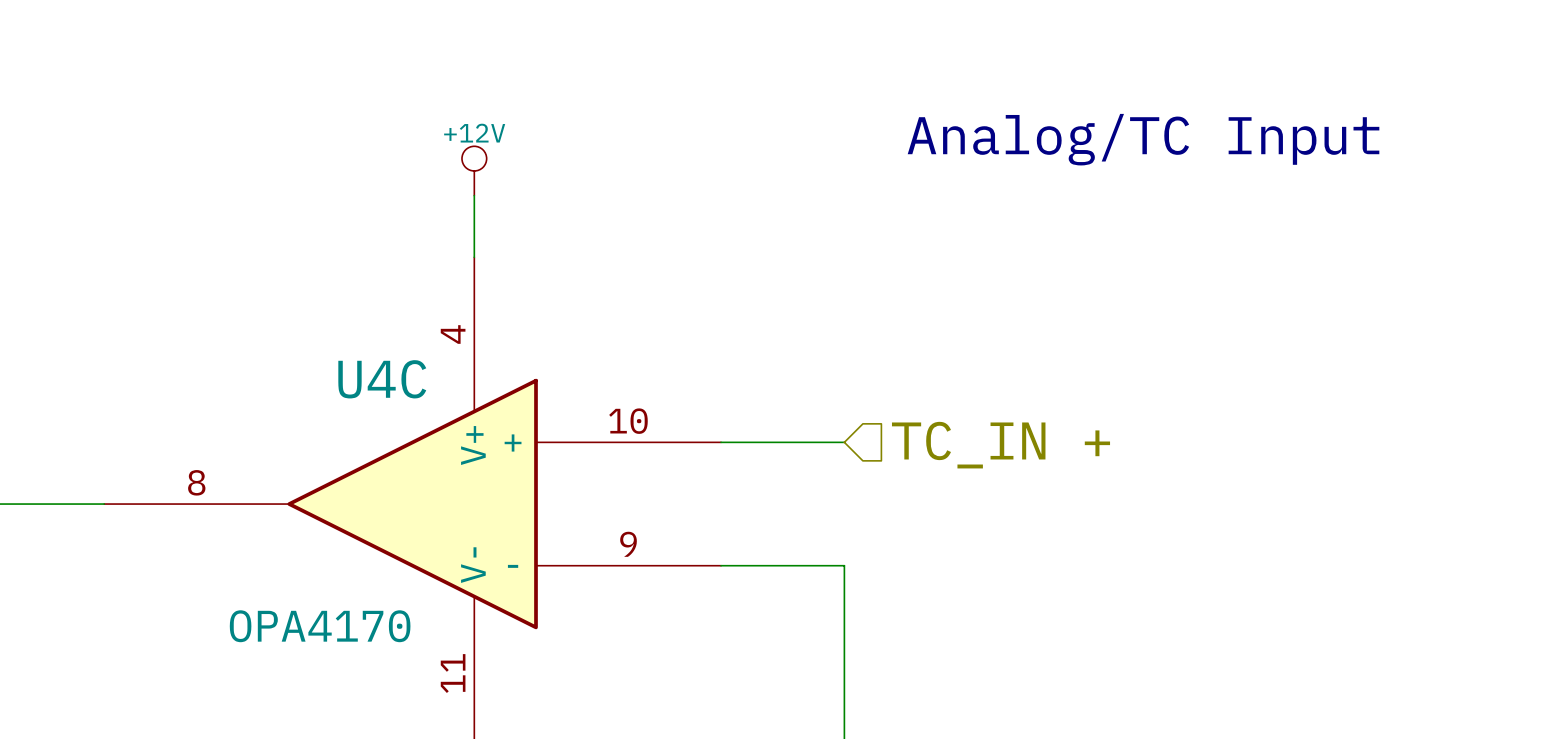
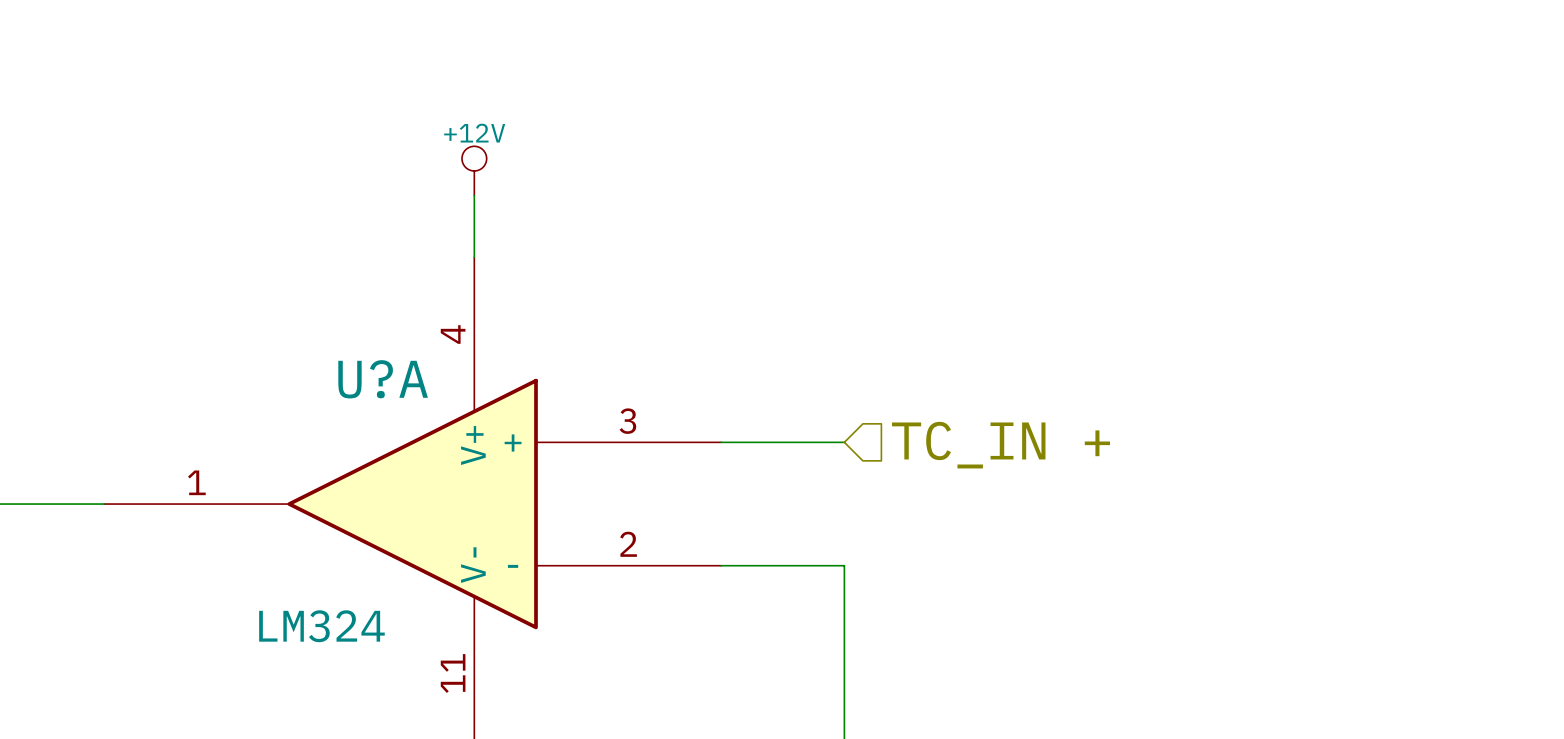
text: Analog/TC Input (1143, 139) -> none
U4C name: U4C (382, 379) -> U?A (383, 379)
U4C pin number: 10 (628, 421) -> 3 (627, 421)
U4C pin number: 8 (196, 482) -> 1 (196, 482)
U4C pin number: 9 (628, 544) -> 2 (628, 544)
U4C value: OPA4170 (320, 626) -> LM324 (321, 626)

